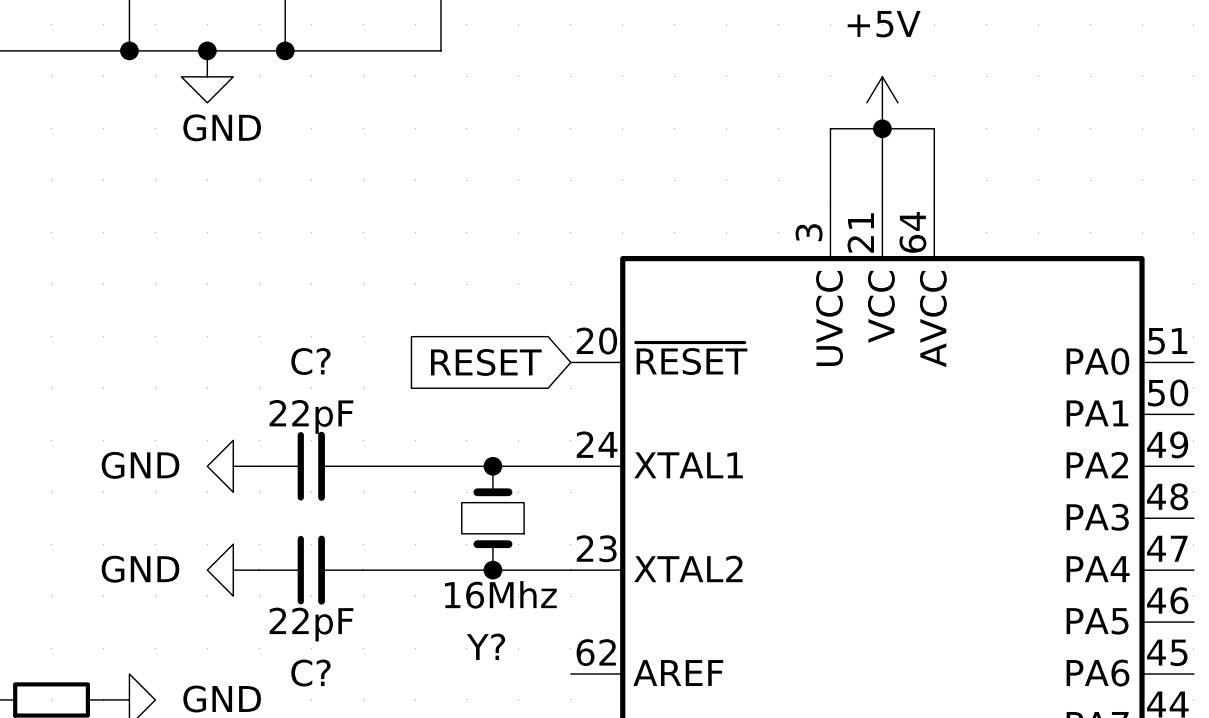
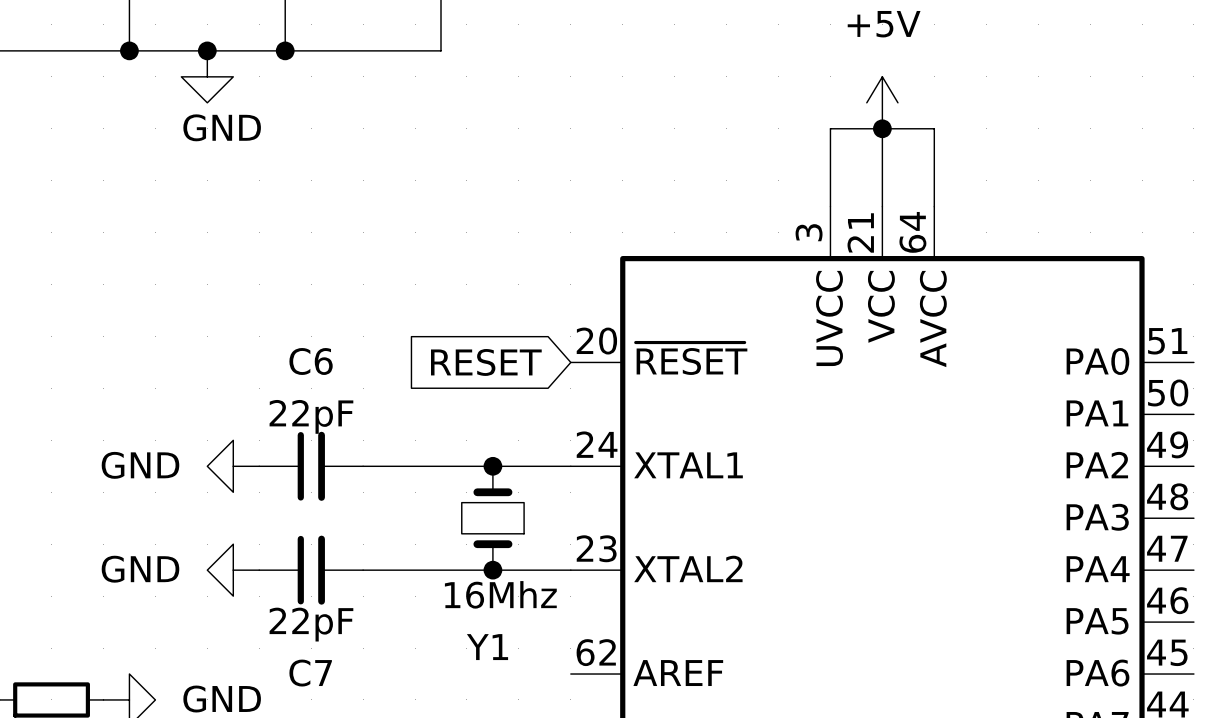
C? name: C? (310, 361) -> C6 (311, 361)
Y? name: Y? (486, 646) -> Y1 (487, 647)
C? name: C? (310, 673) -> C7 (310, 673)

